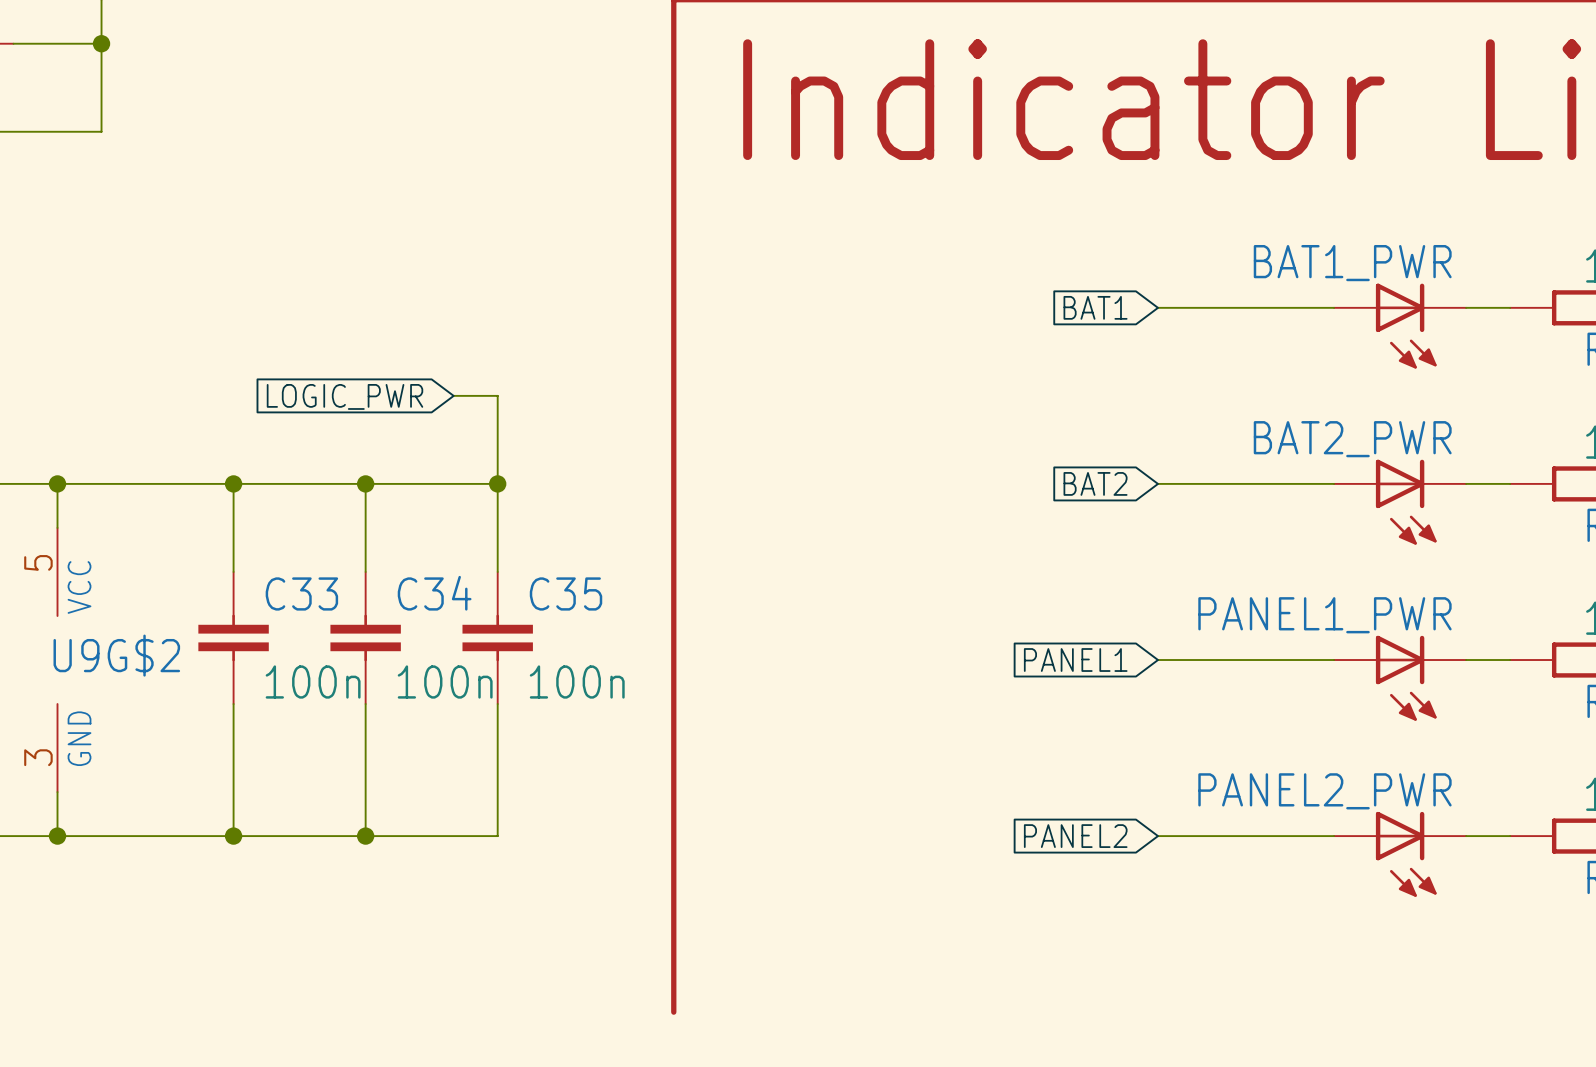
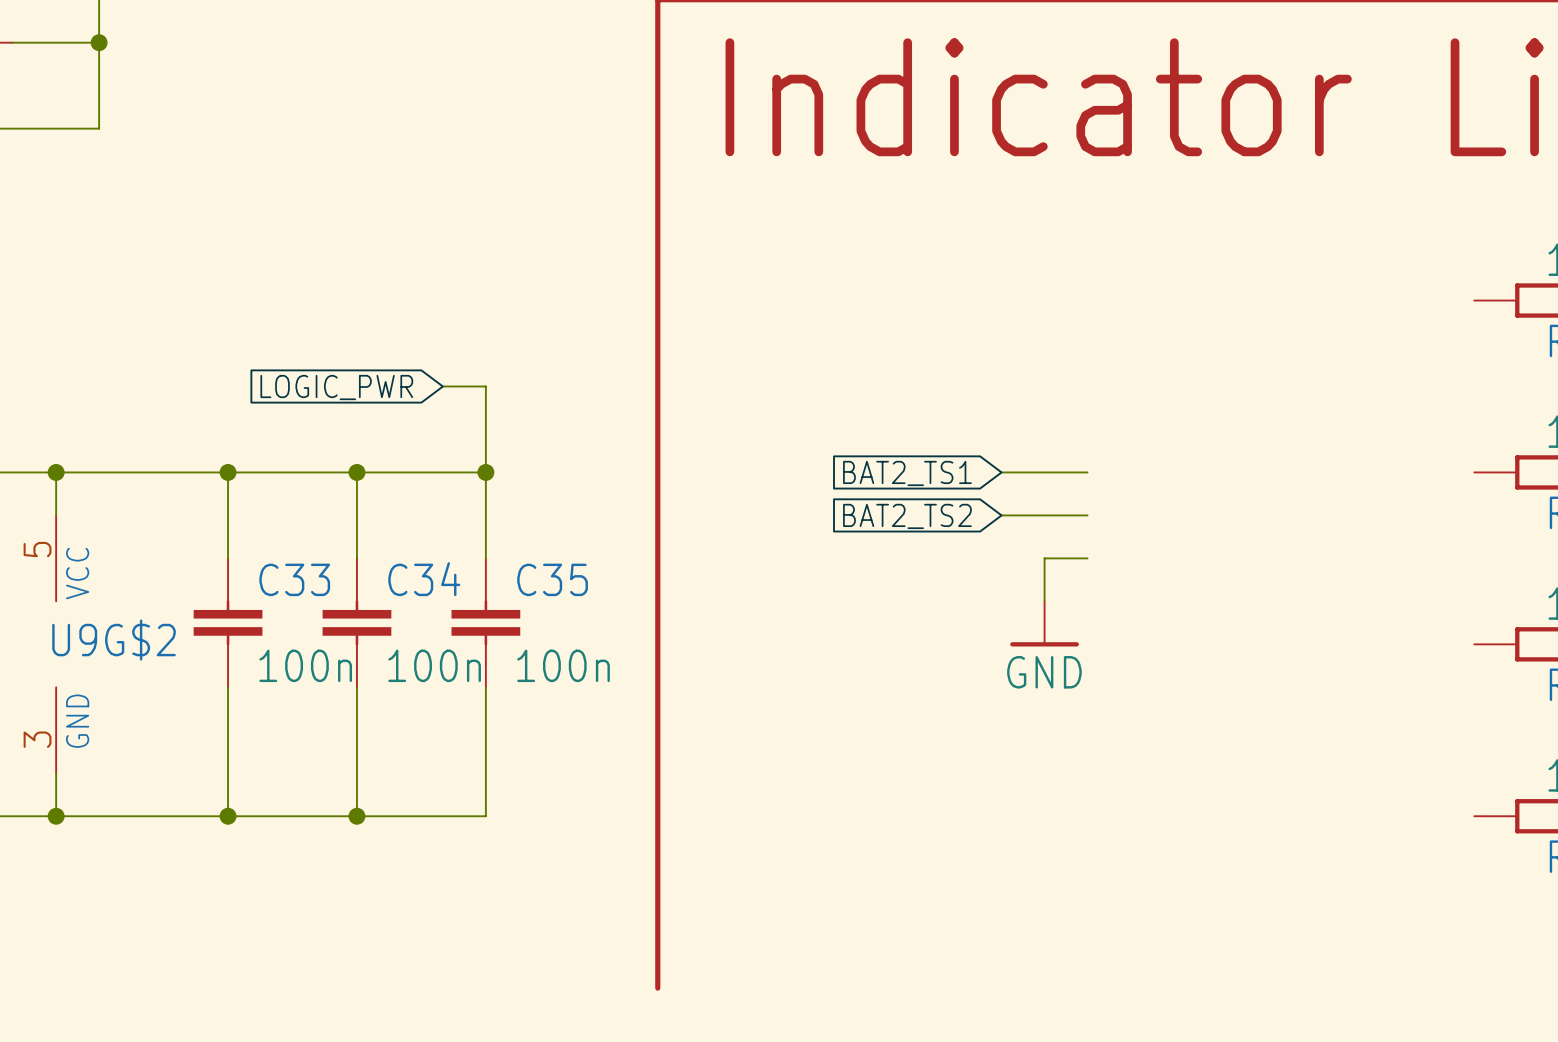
global label: BAT1 (1095, 307) -> none
wire: (1157, 307) (1334, 307) -> none
wire: (1466, 307) (1510, 307) -> none
BAT1_PWR: (1400, 326) -> none
wire: none -> (1001, 472) (1087, 472)
global label: BAT2 (1095, 483) -> none
wire: (1157, 483) (1334, 483) -> none
wire: (1466, 483) (1510, 483) -> none
global label: none -> BAT2_TS1 (907, 473)
BAT2_PWR: (1400, 502) -> none
wire: none -> (1001, 515) (1087, 515)
global label: none -> BAT2_TS2 (907, 516)
wire: none -> (1087, 558) (1044, 558) (1044, 601)
power symbol: none -> GND (1044, 623)
global label: PANEL1 (1075, 660) -> none
wire: (1157, 660) (1334, 660) -> none
wire: (1466, 660) (1510, 660) -> none
PANEL1_PWR: (1400, 678) -> none
global label: PANEL2 (1075, 836) -> none
wire: (1157, 836) (1334, 836) -> none
wire: (1466, 836) (1510, 836) -> none
PANEL2_PWR: (1400, 854) -> none

